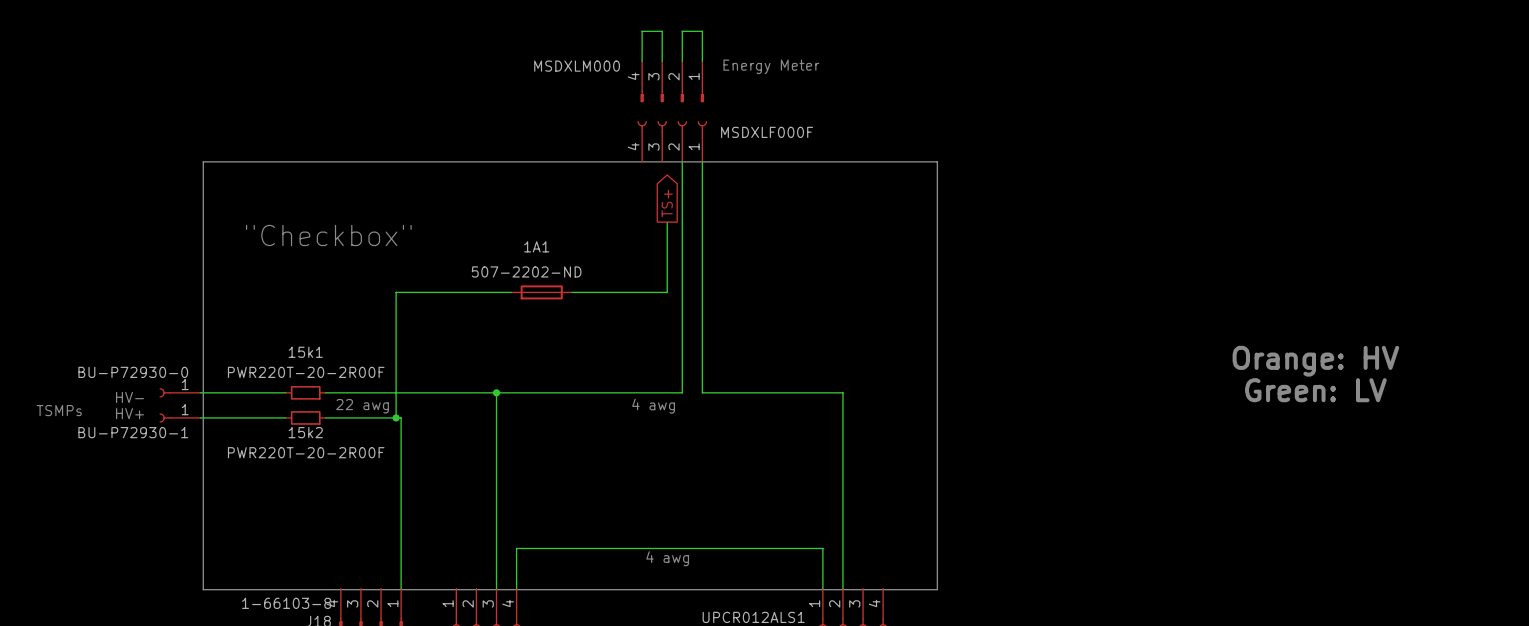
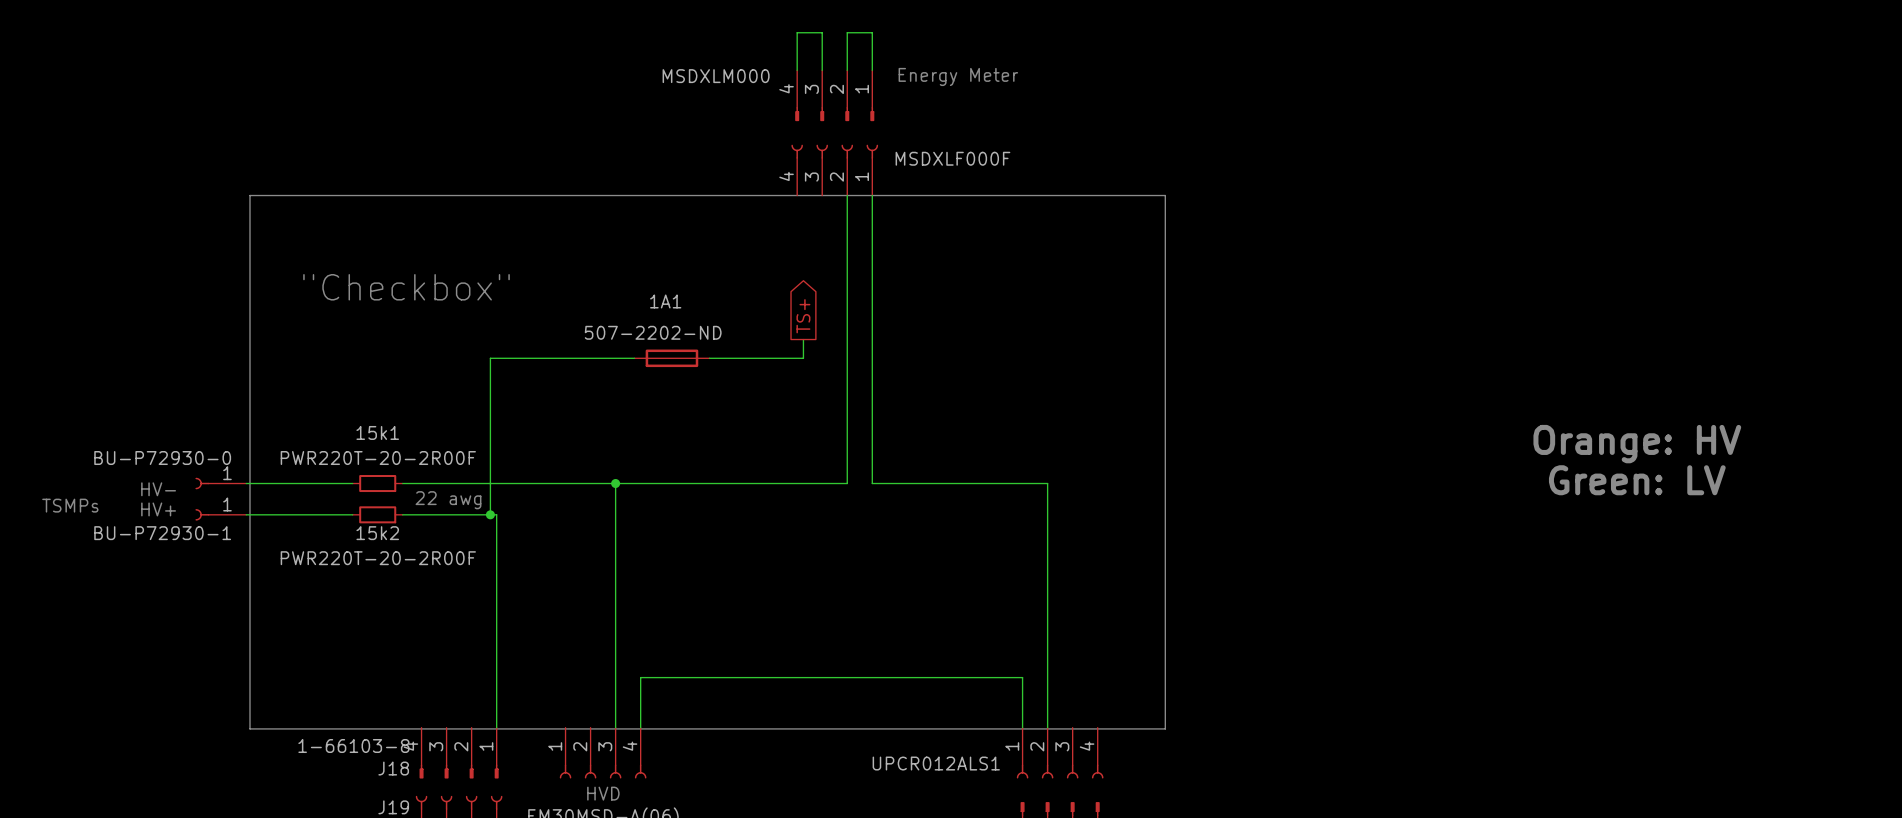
global label position: TS+ (667, 203) -> TS+ (803, 316)
wire: (667, 222) (667, 292) (647, 292) -> (803, 339) (803, 358)
text: 4 awg (653, 406) -> none
text: 4 awg (667, 558) -> none

